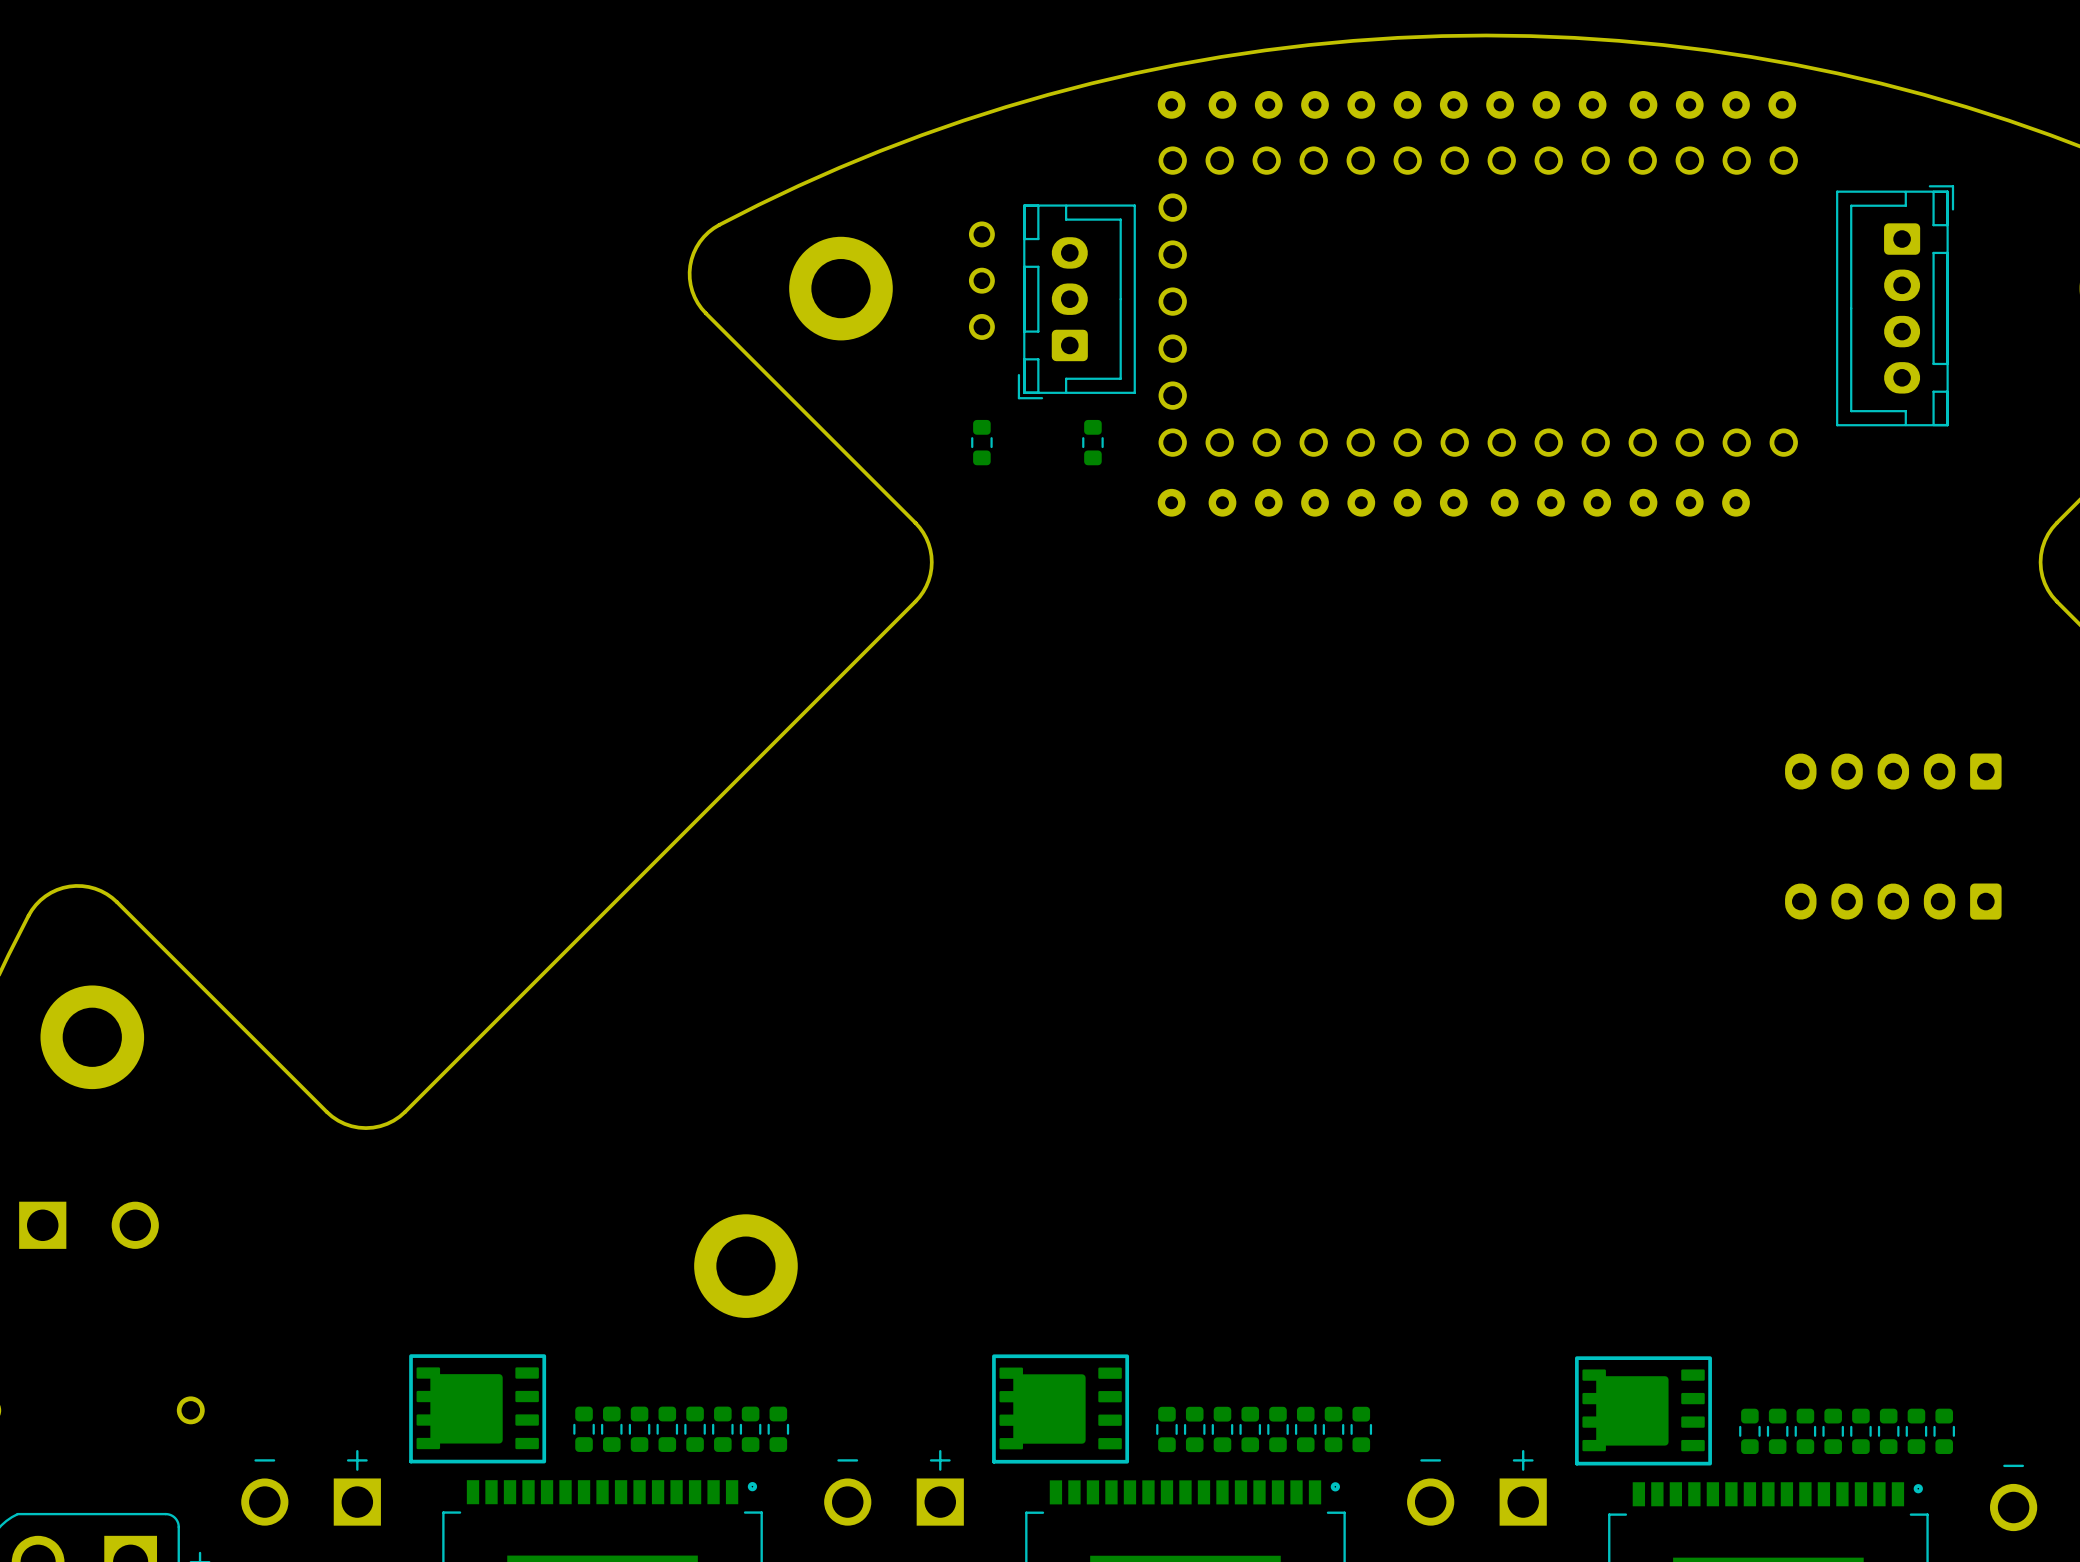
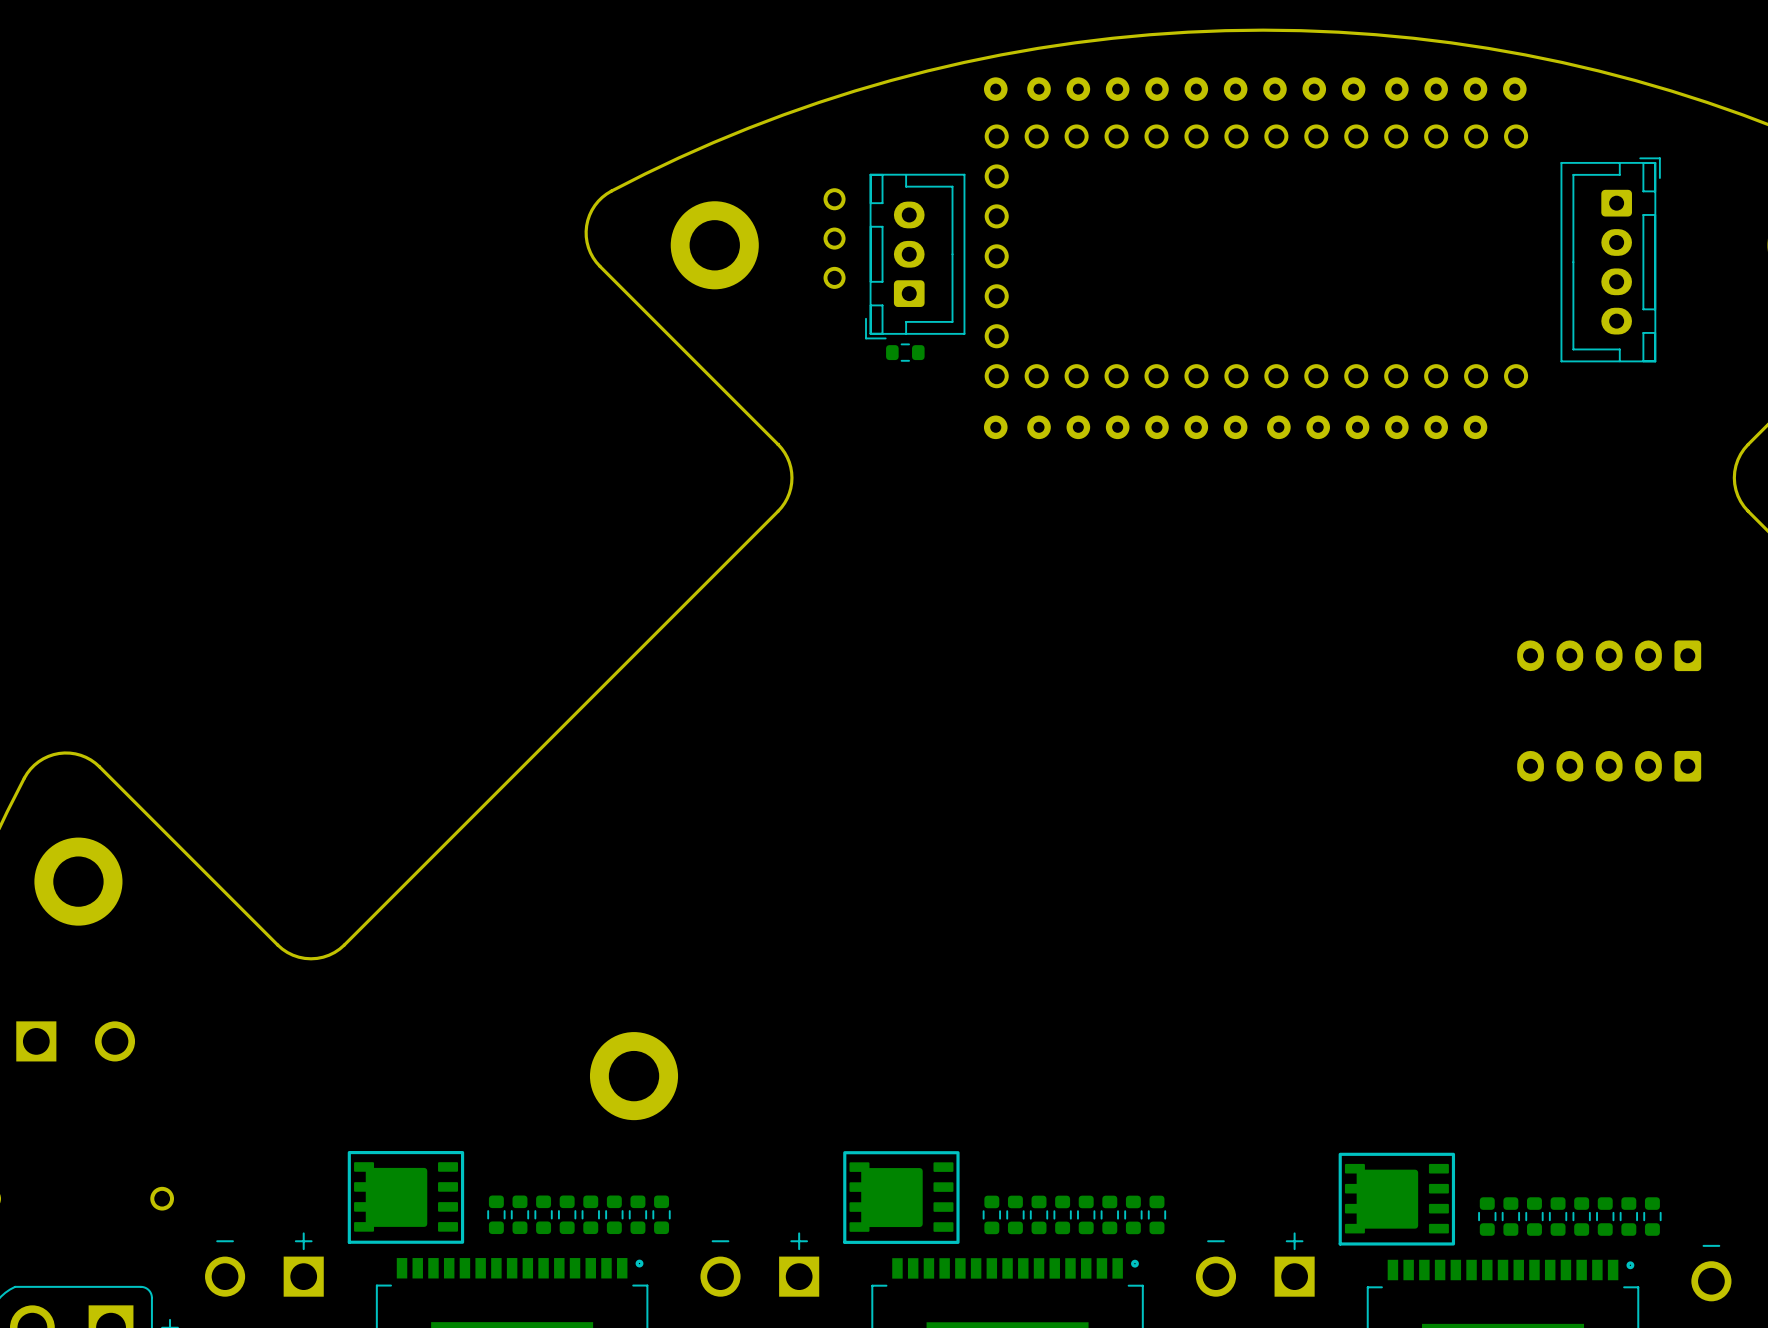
part: (981, 442) -> none
part rotation: 0° (1092, 442) -> 90° clockwise (905, 352)
part position: (1092, 442) -> (905, 352)

